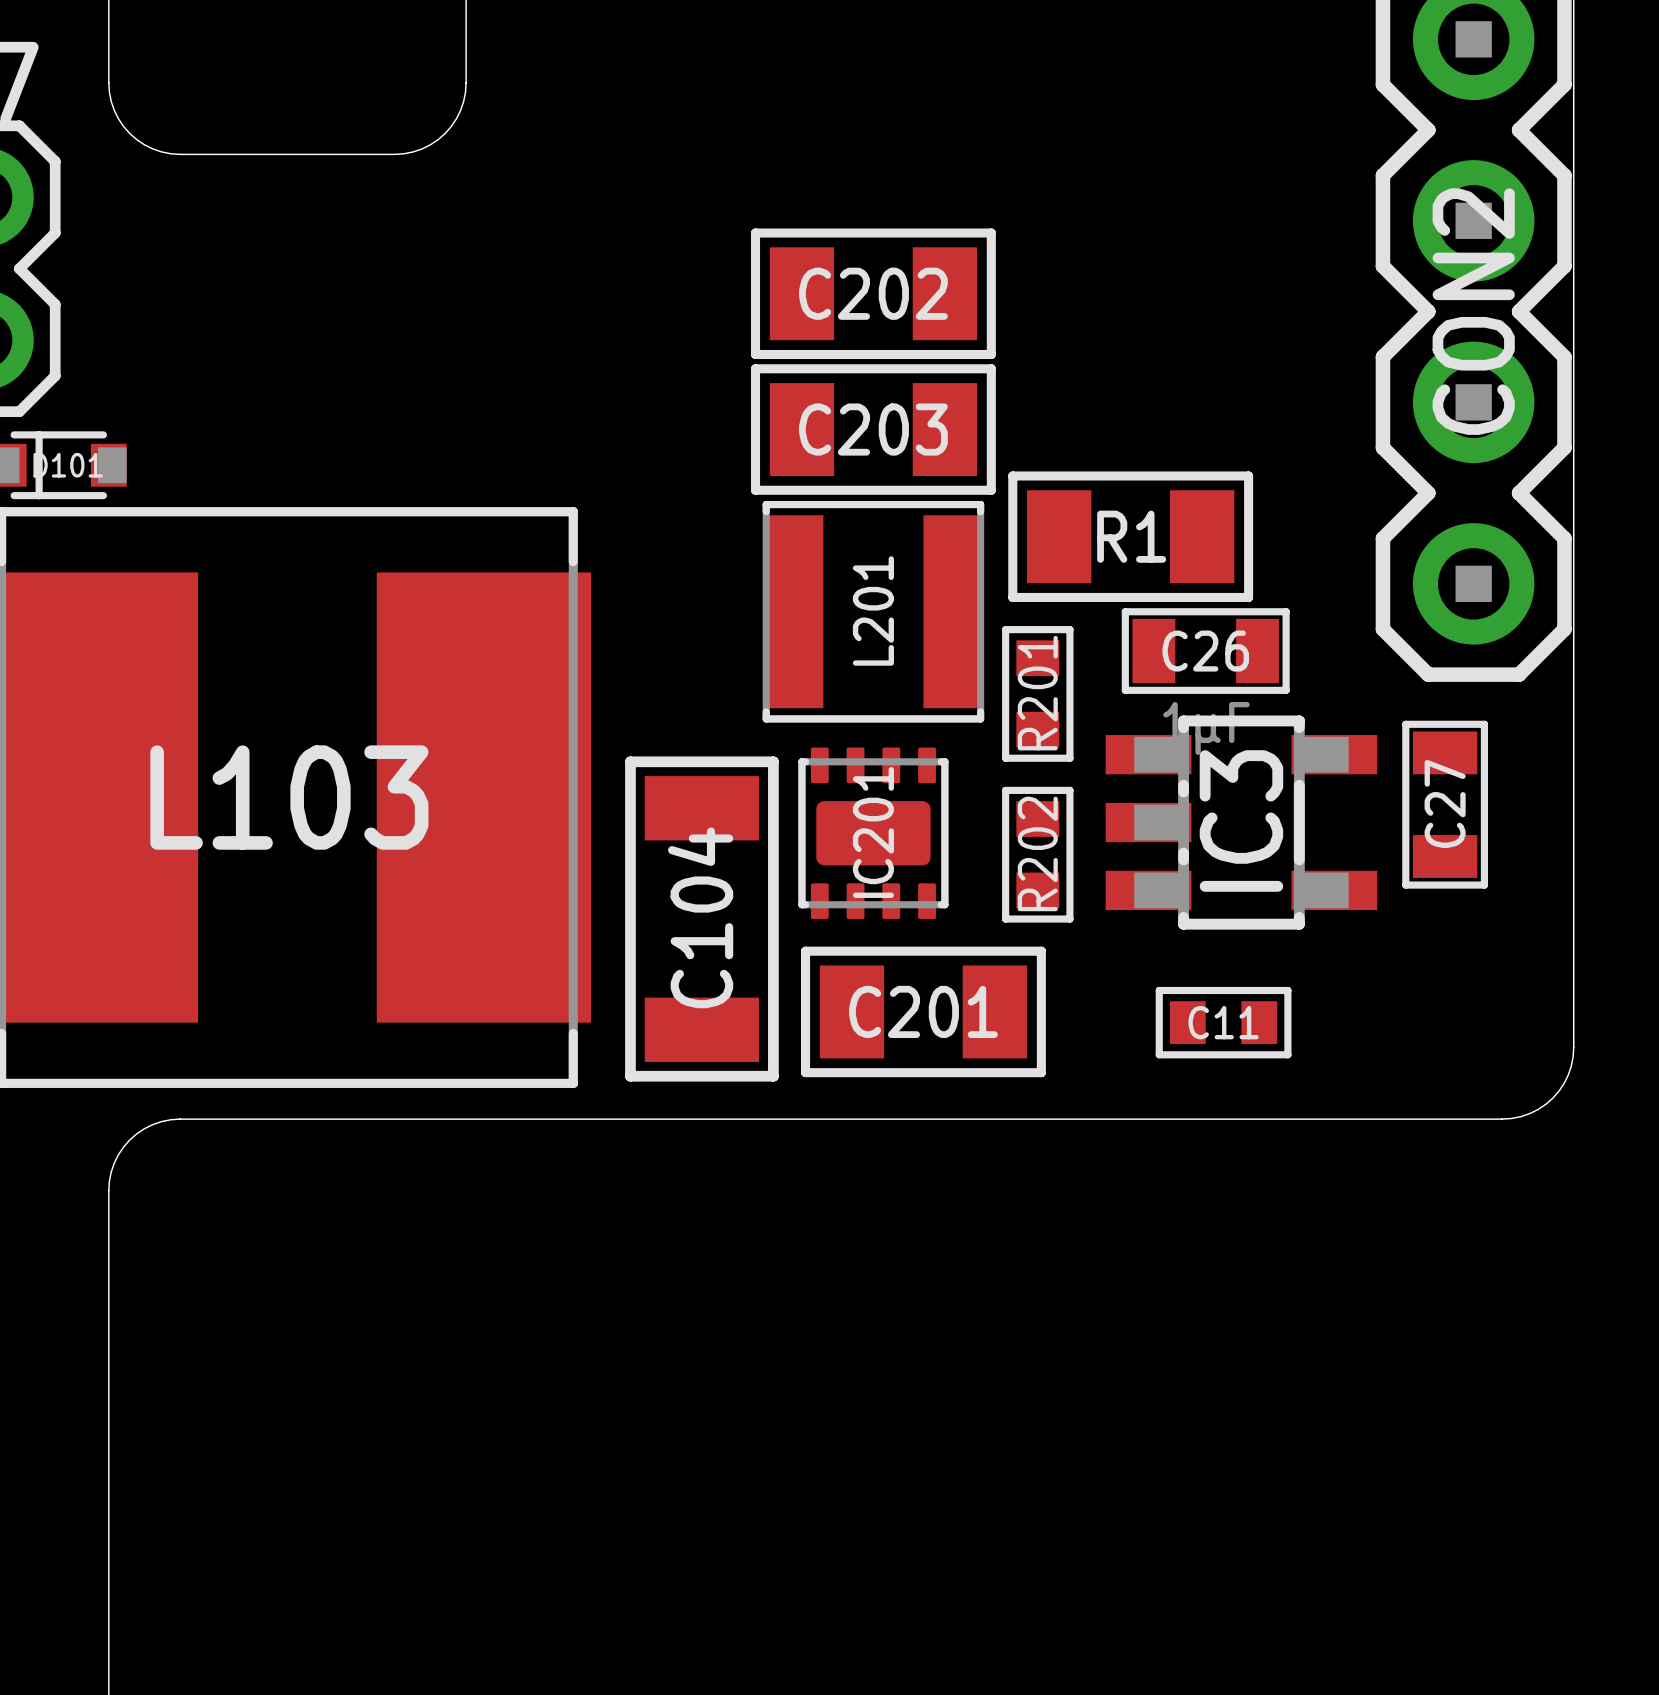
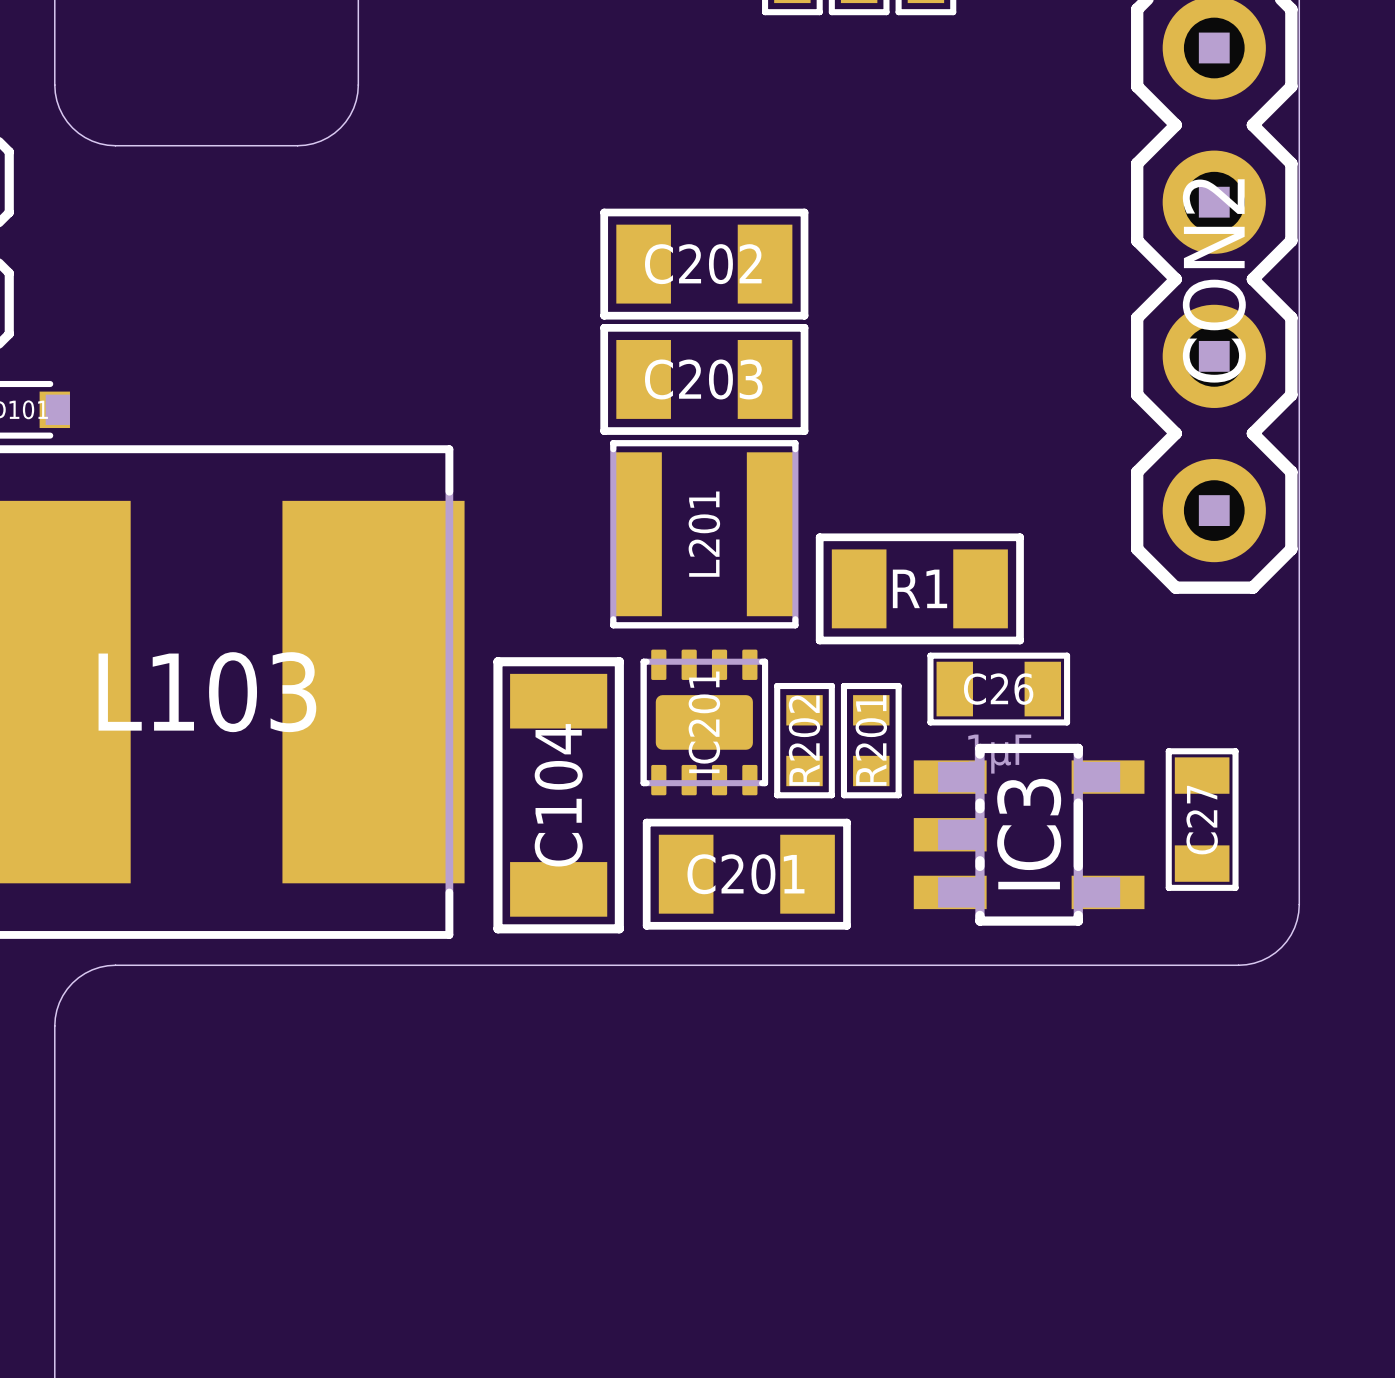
R1 position: (1130, 536) -> (919, 588)
C26 position: (1205, 651) -> (998, 689)
R201 position: (1037, 693) -> (871, 740)
C27 position: (1445, 804) -> (1202, 819)
IC3 position: (1241, 822) -> (1029, 834)
R202 position: (1037, 854) -> (804, 740)
C11: (1223, 1022) -> none

